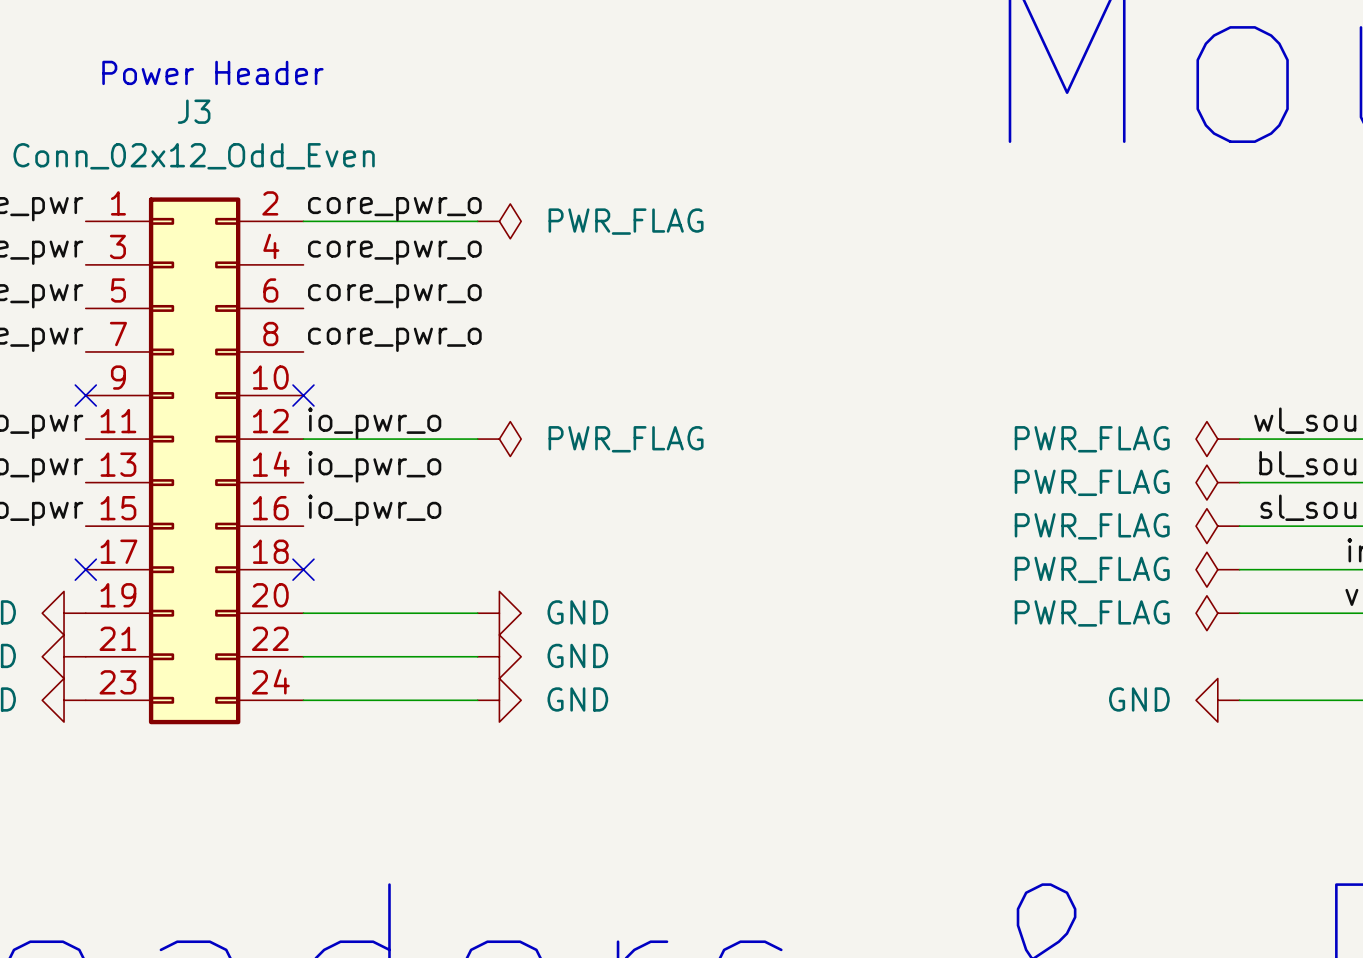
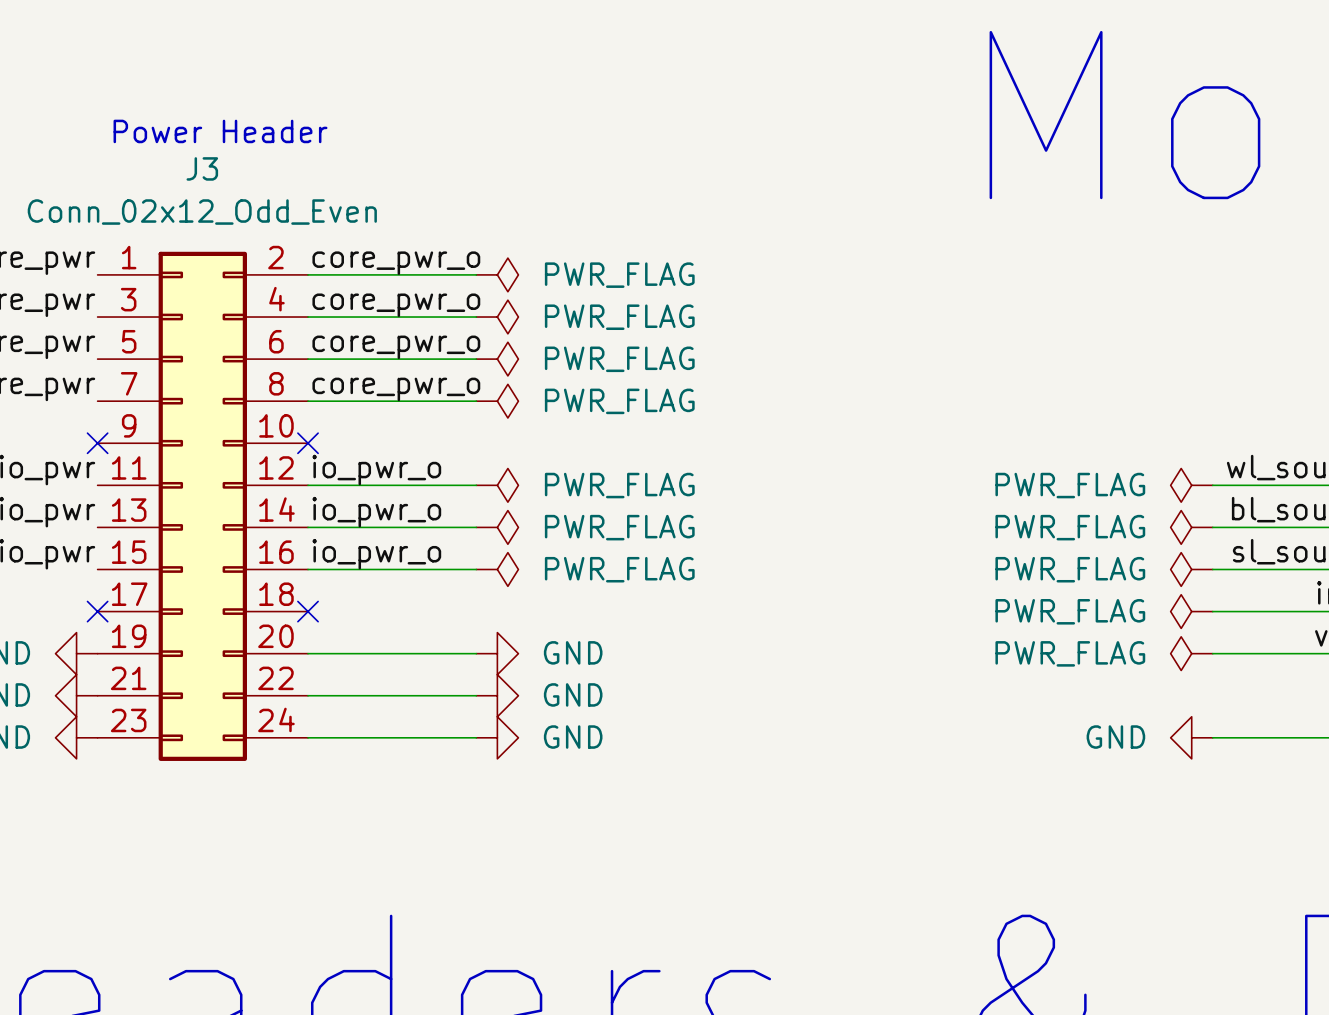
wire: none -> (308, 317) (476, 317)
power symbol: none -> PWR_FLAG (497, 317)
wire: none -> (308, 359) (476, 359)
power symbol: none -> PWR_FLAG (497, 359)
wire: none -> (308, 401) (476, 401)
power symbol: none -> PWR_FLAG (497, 401)
wire: none -> (308, 527) (476, 527)
power symbol: none -> PWR_FLAG (497, 527)
wire: none -> (308, 569) (476, 569)
power symbol: none -> PWR_FLAG (497, 569)

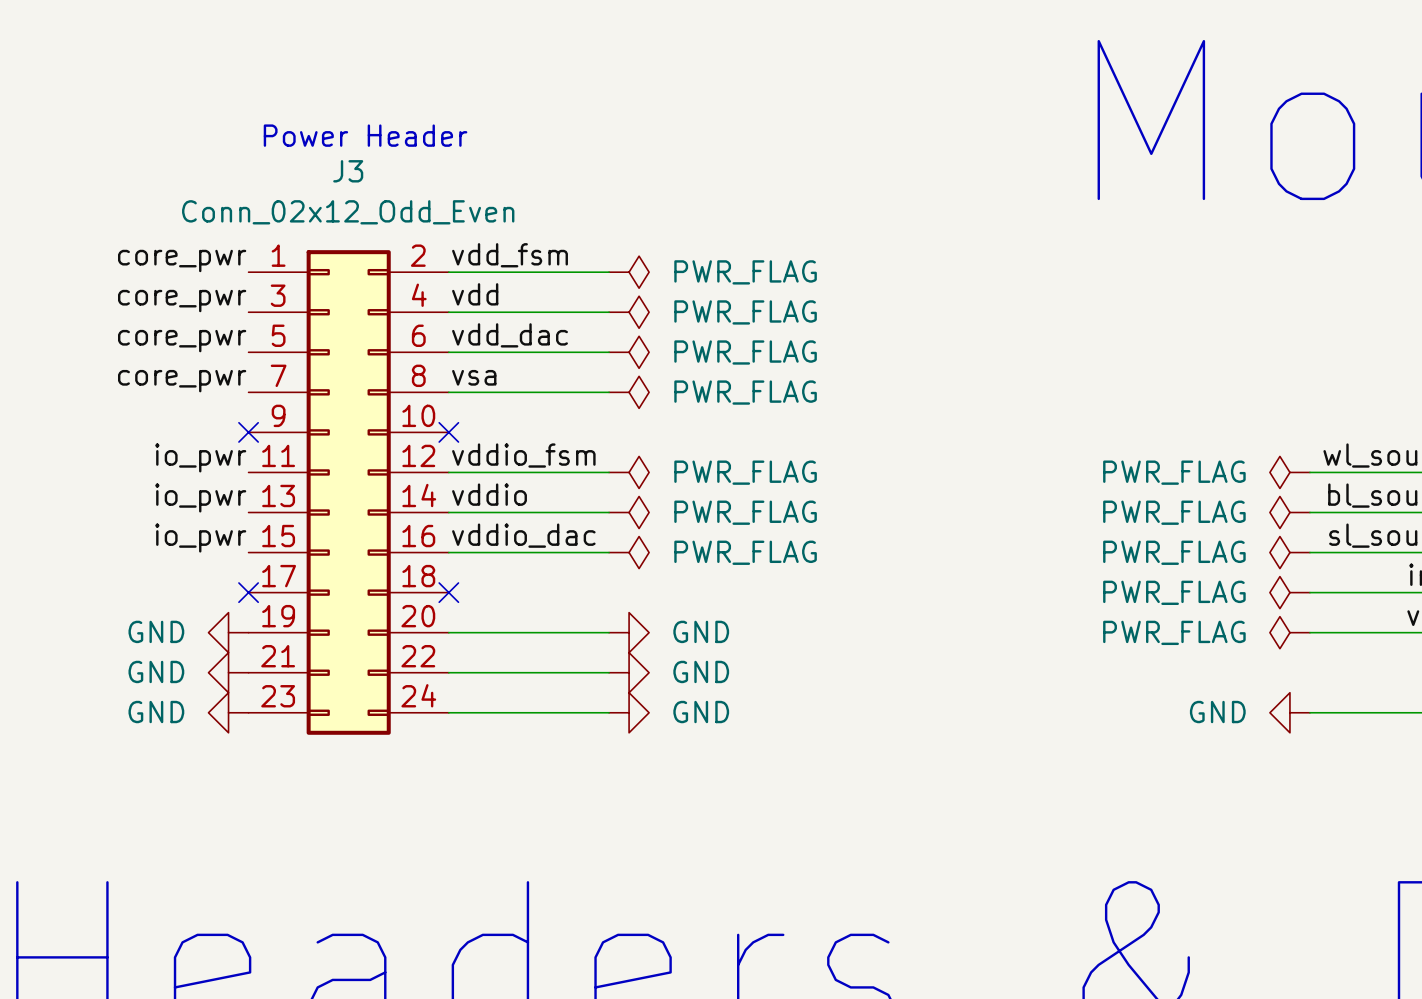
label: core_pwr_o (396, 263) -> vdd_fsm (510, 255)
label: core_pwr_o (396, 305) -> vdd (475, 294)
label: core_pwr_o (396, 347) -> vdd_dac (510, 335)
label: core_pwr_o (396, 389) -> vsa (474, 377)
label: io_pwr_o (376, 470) -> vddio_fsm (523, 455)
label: io_pwr_o (376, 512) -> vddio (489, 494)
label: io_pwr_o (376, 554) -> vddio_dac (523, 535)

